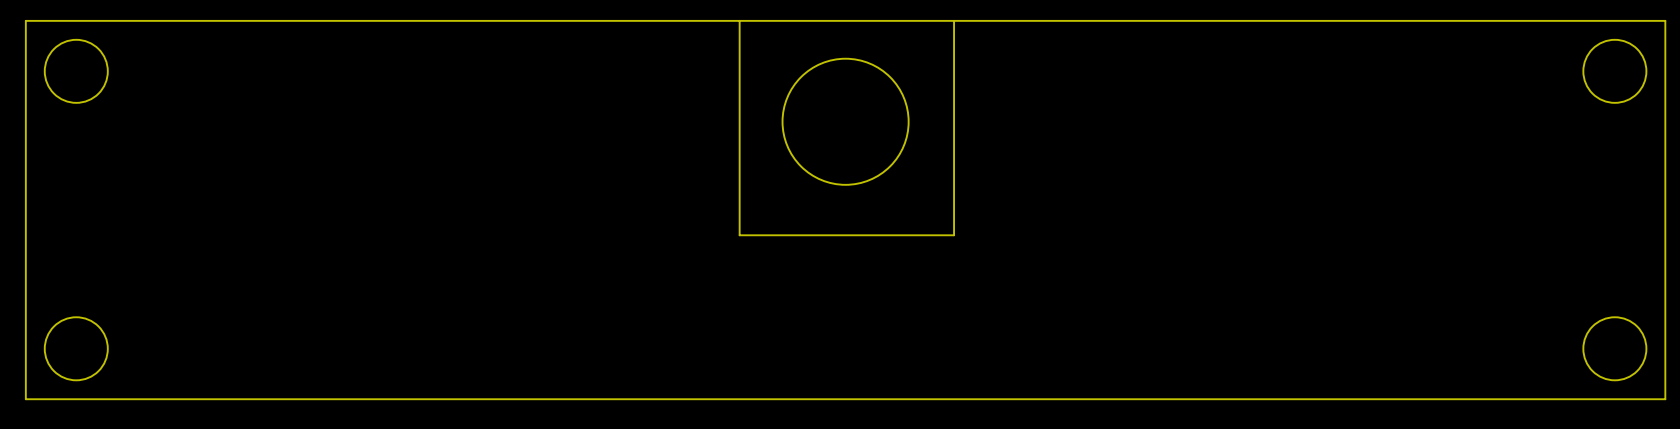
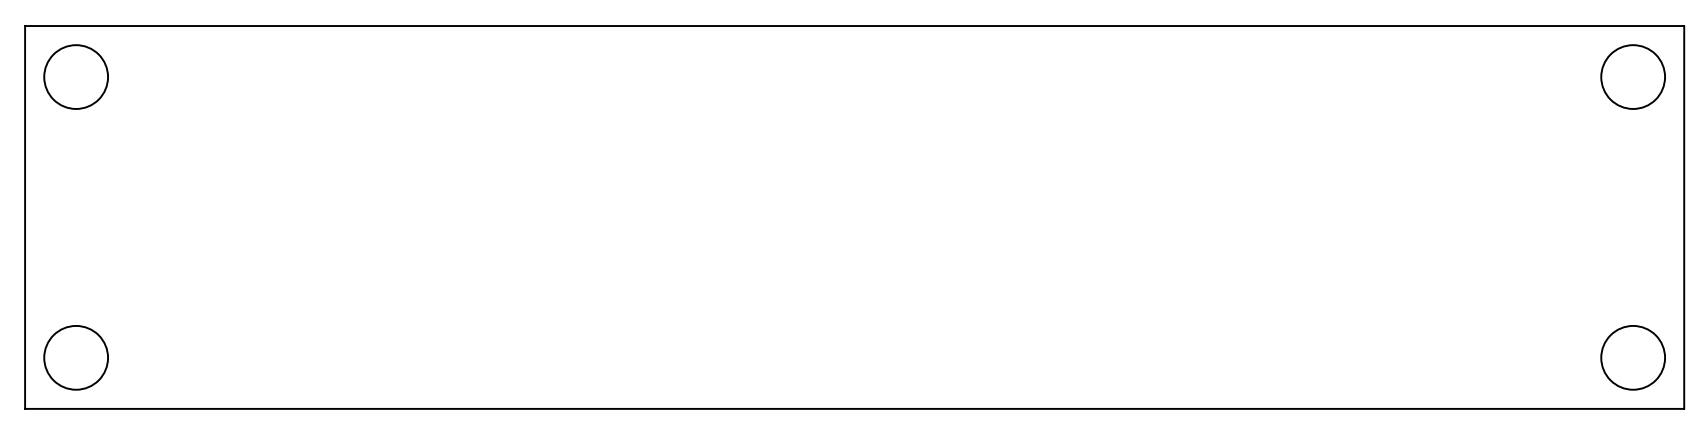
board edge: (739, 20) (739, 235) (954, 235) (954, 20) -> none
round board edge: [781, 57, 910, 186] -> none

